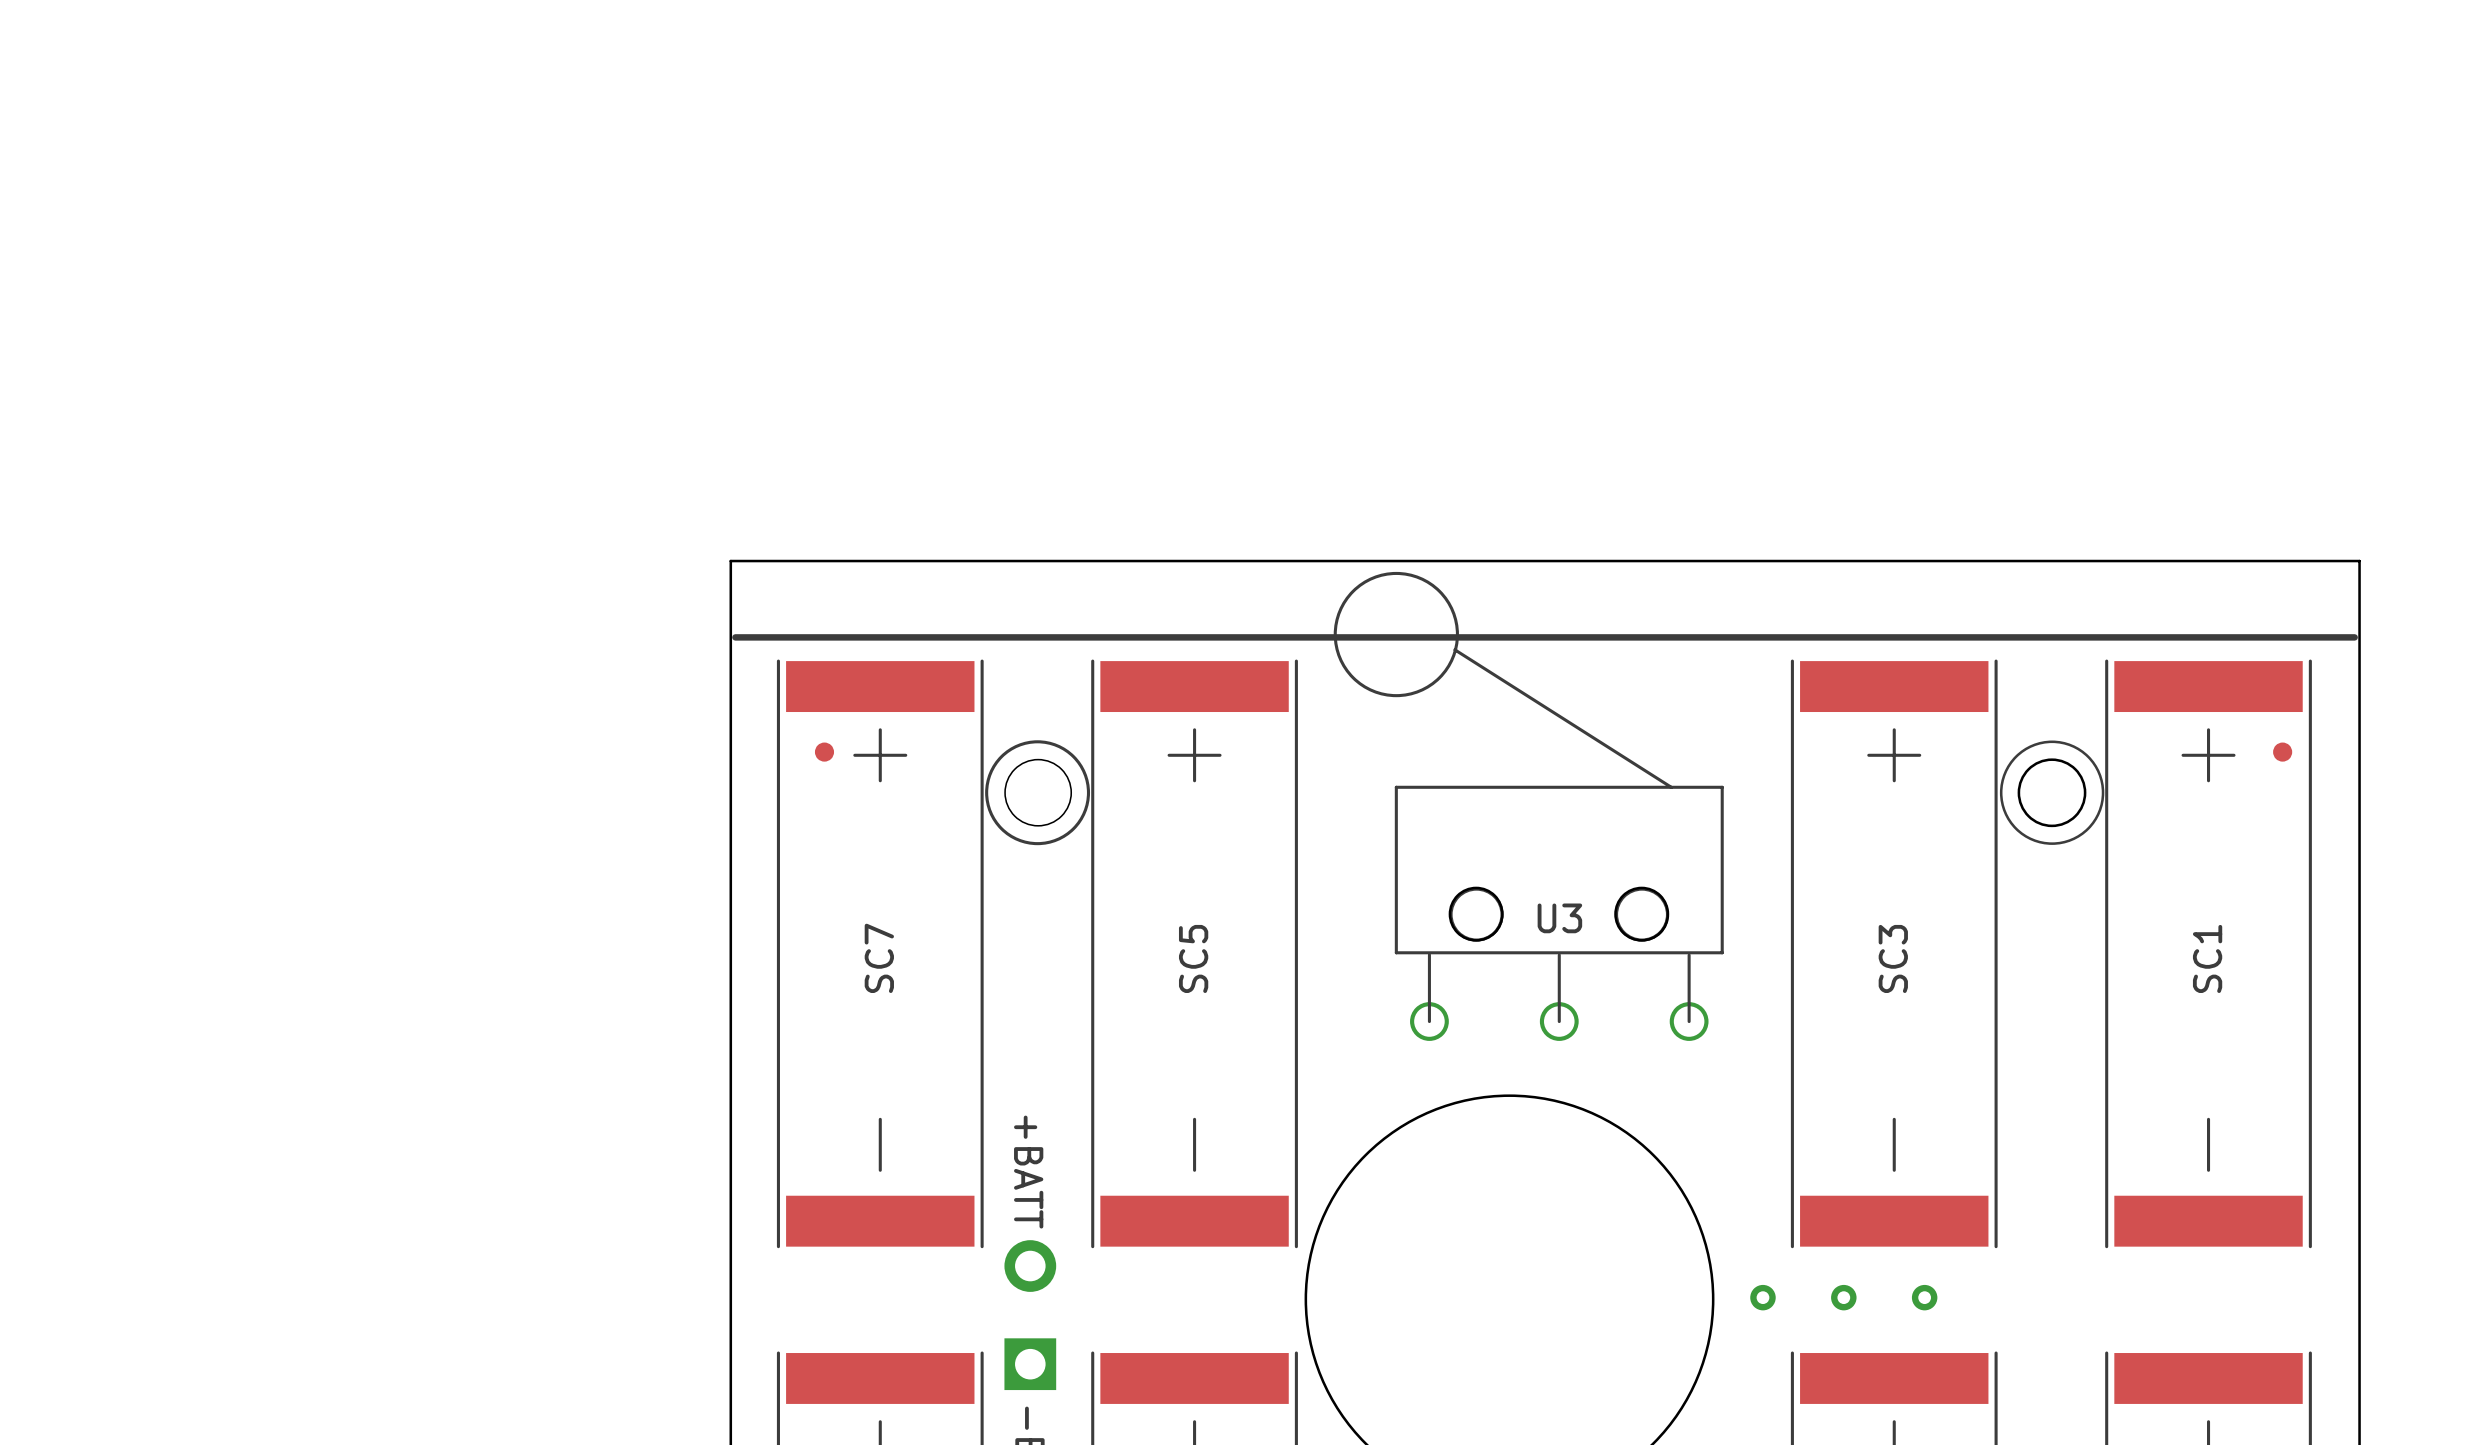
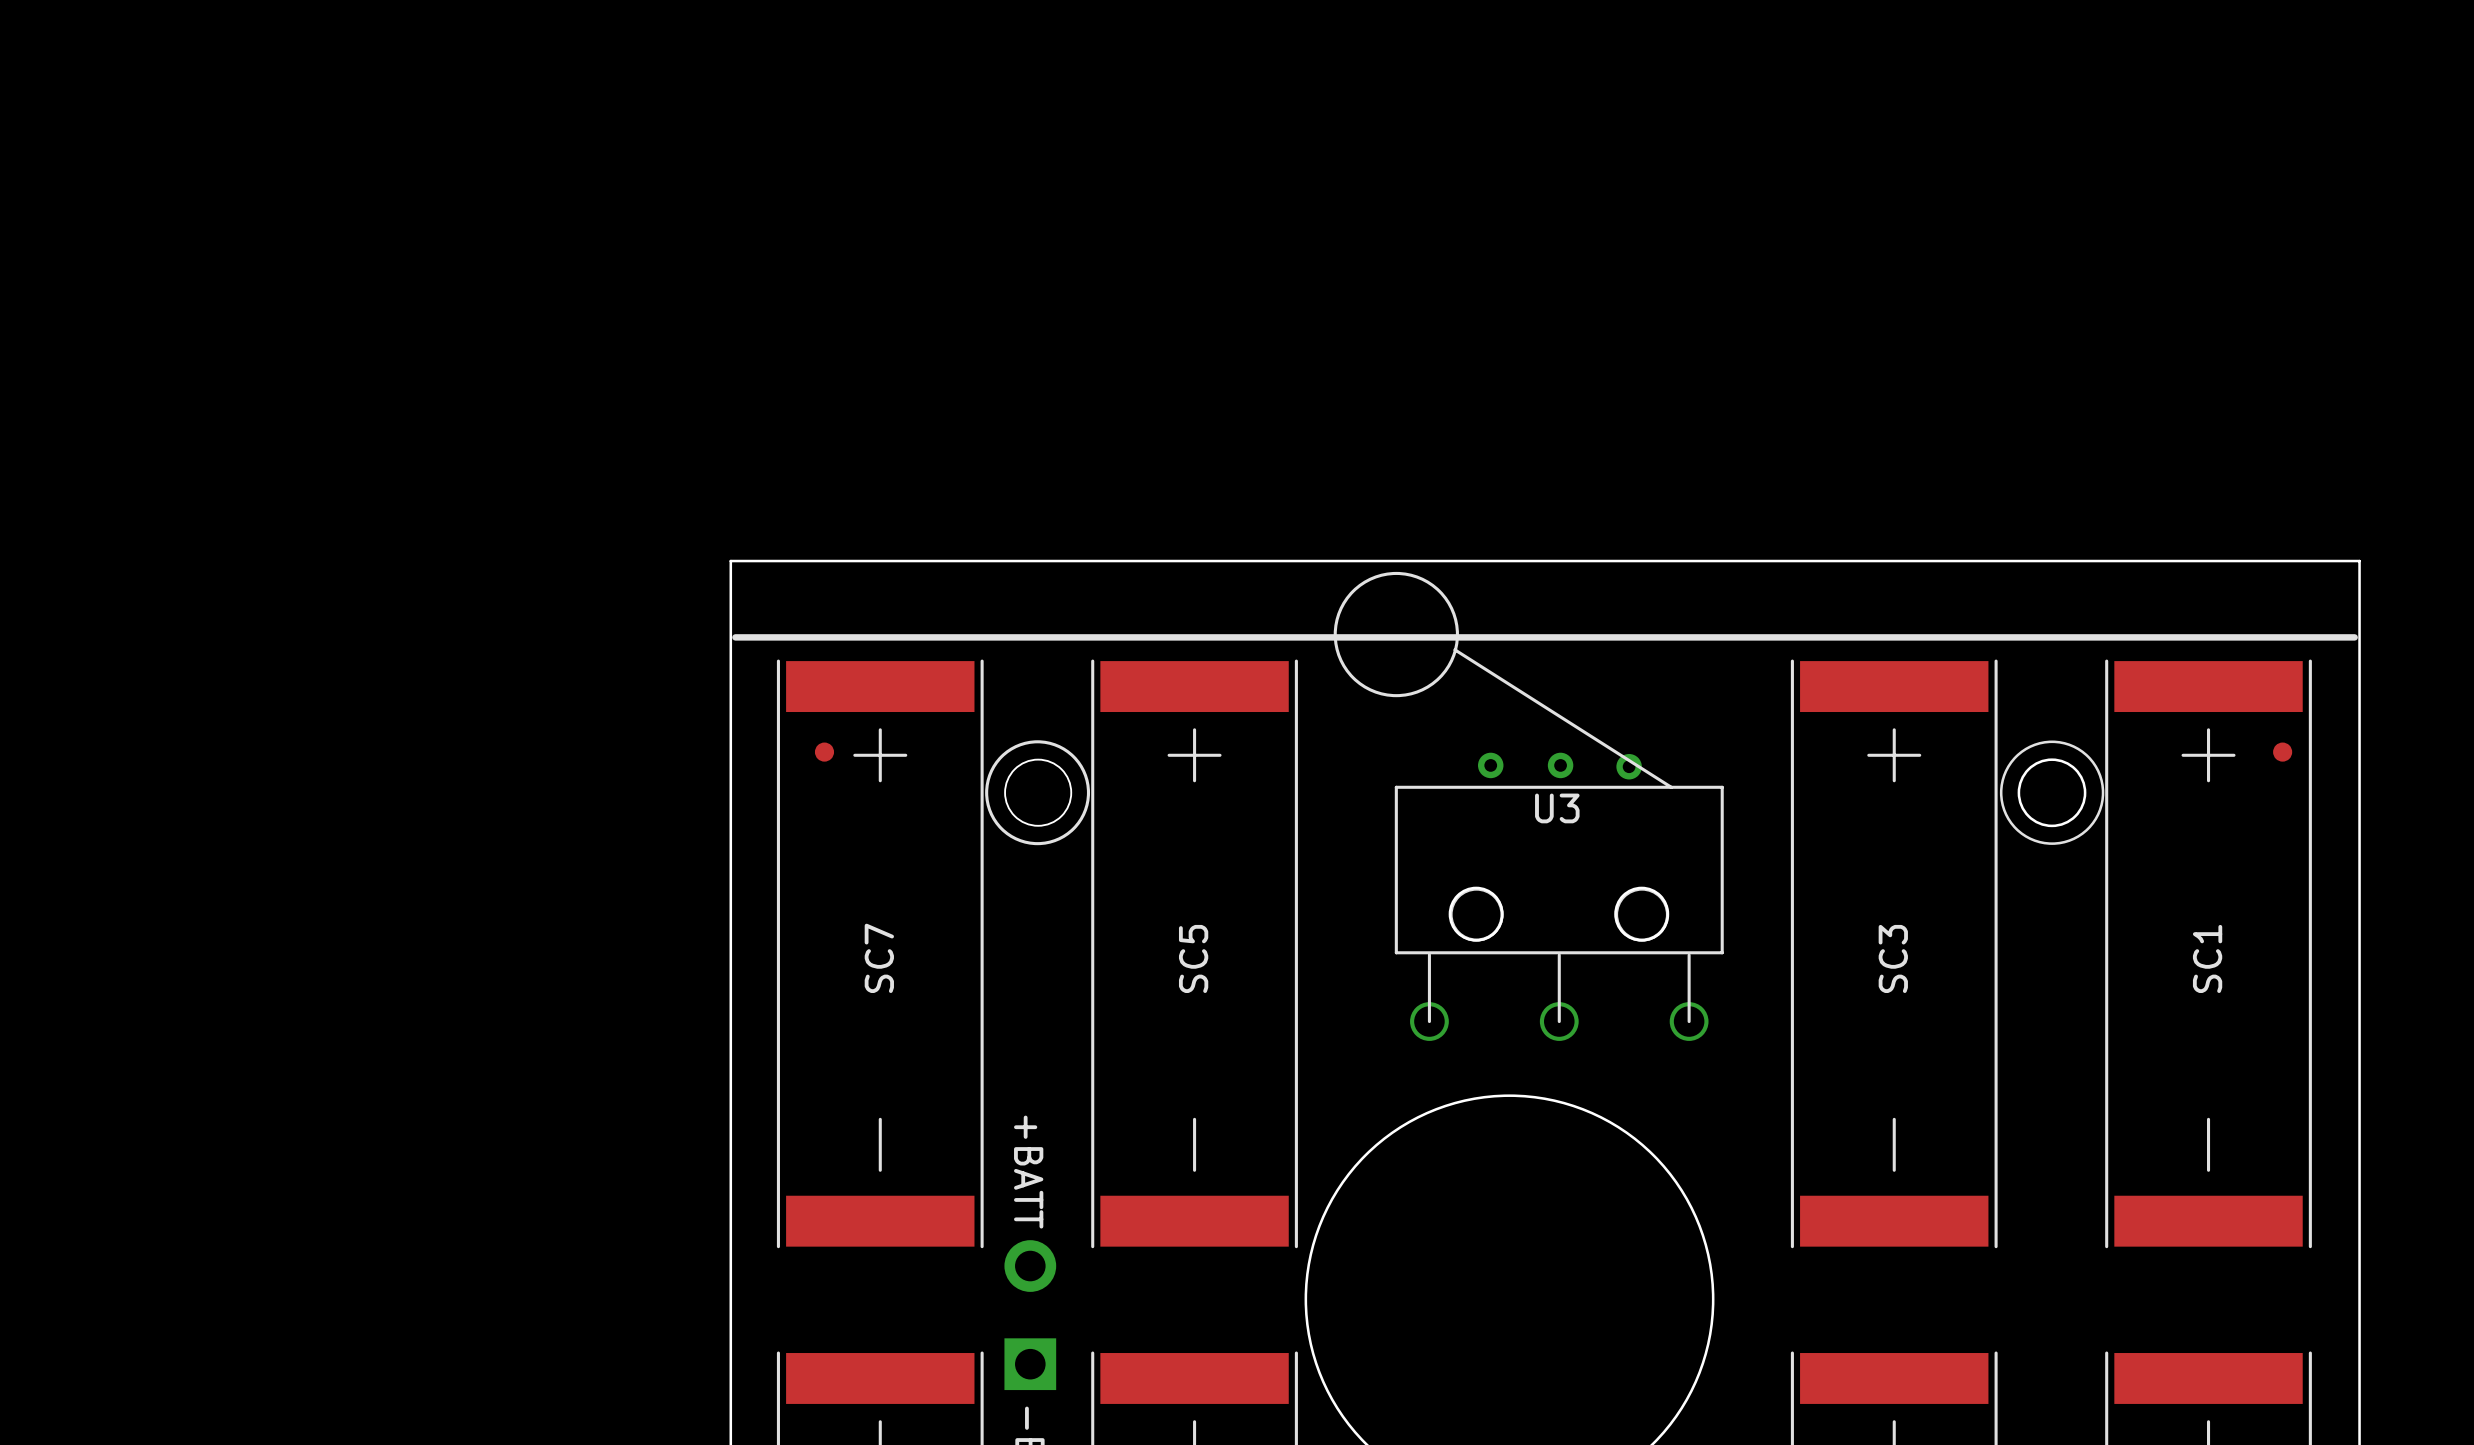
part: none -> (1490, 765)
part: none -> (1560, 765)
part: none -> (1629, 766)
U3 name position: U3 (1559, 918) -> U3 (1557, 808)
part: (1762, 1297) -> none
part: (1843, 1297) -> none
part: (1924, 1297) -> none

